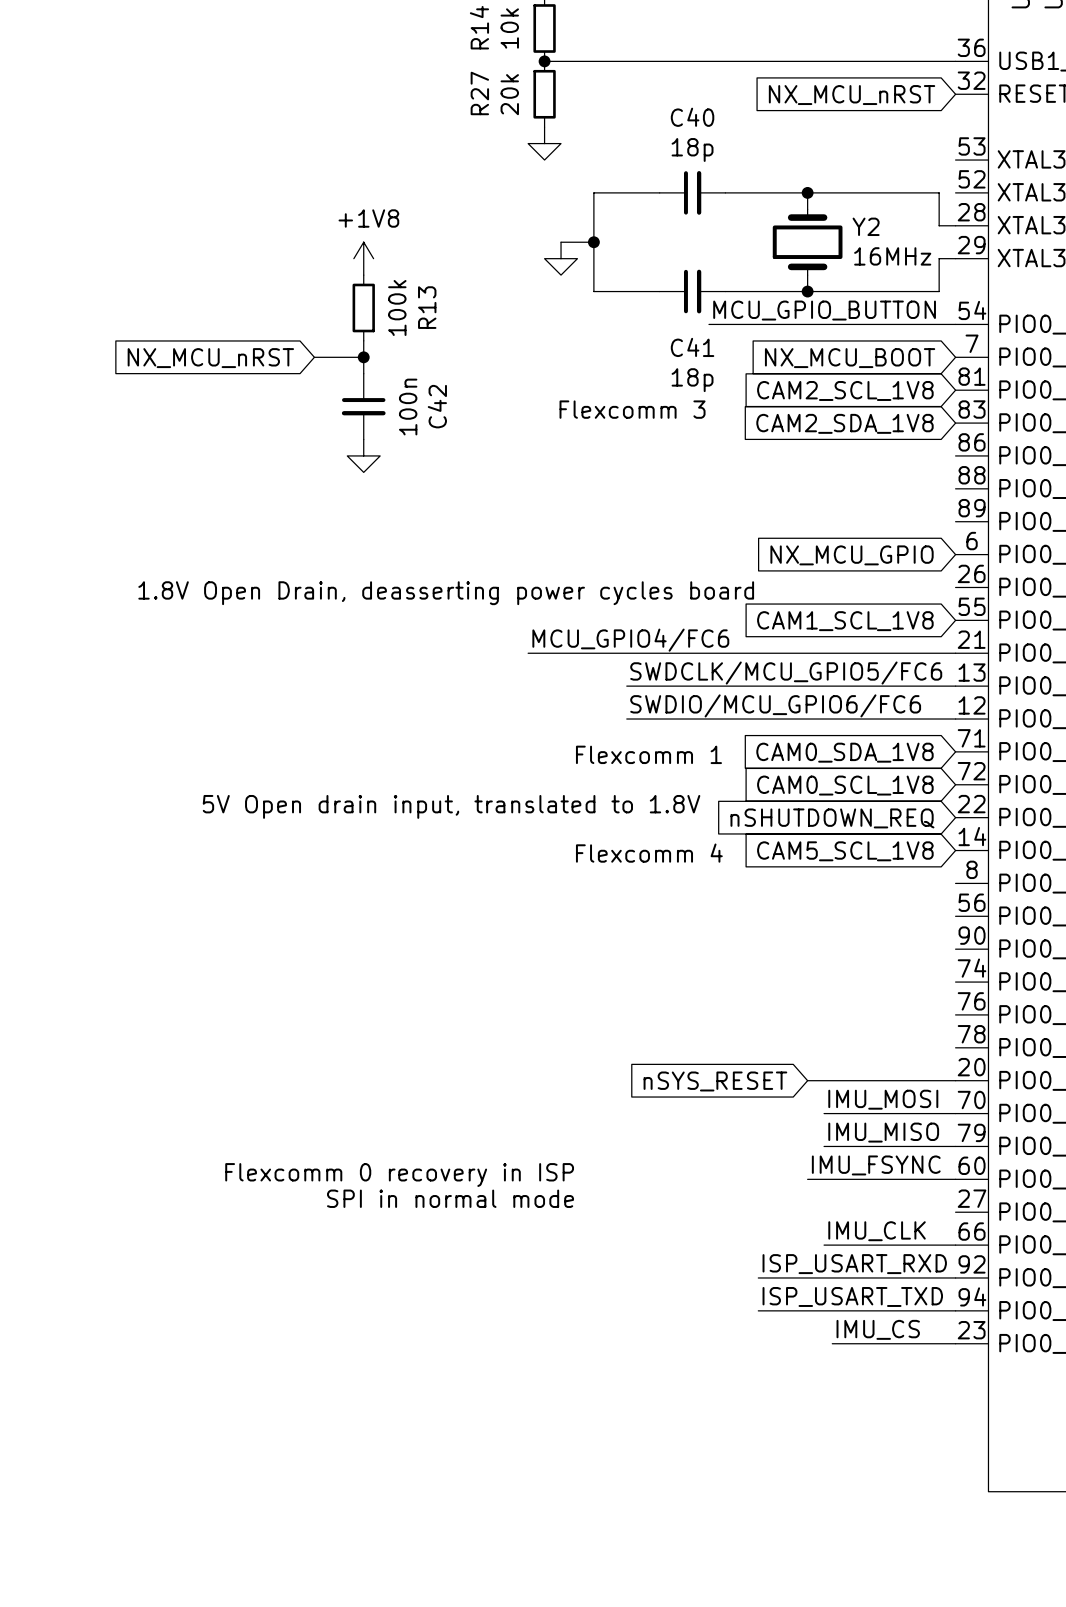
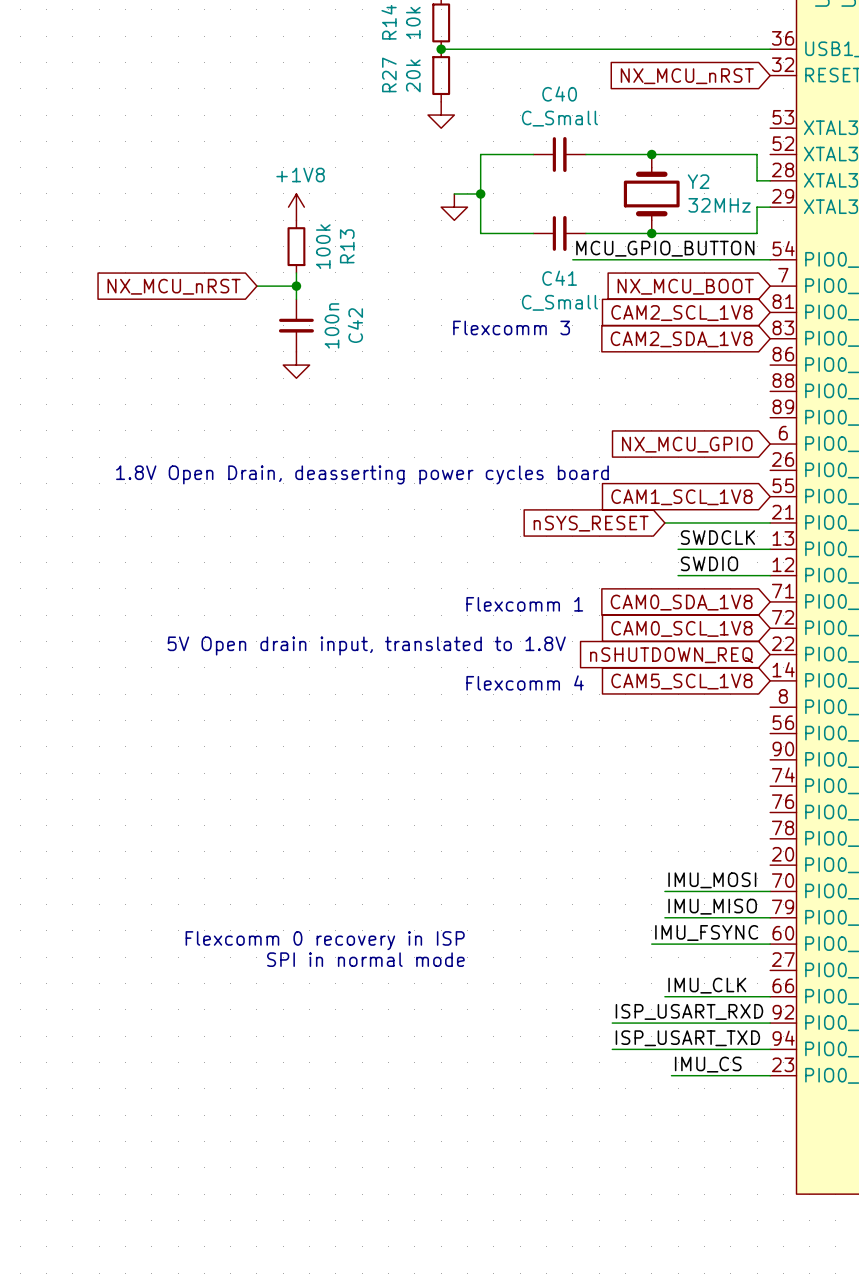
C40 value: 18p (692, 149) -> C_Small (559, 118)
Y2 value: 16MHz (892, 256) -> 32MHz (719, 205)
C41 value: 18p (692, 380) -> C_Small (559, 302)
label: MCU_GPIO4/FC6 (630, 640) -> none
wire: (528, 653) (824, 653) -> none
global label: none -> nSYS_RESET (591, 523)
label: none -> SWDCLK (717, 537)
label: SWDCLK/MCU_GPIO5/FC6 (786, 673) -> none
wire: (626, 686) (840, 686) -> none
label: none -> SWDIO (709, 563)
label: SWDIO/MCU_GPIO6/FC6 (775, 705) -> none
wire: (626, 719) (840, 719) -> none
wire: (807, 1080) (955, 1080) -> none
global label: nSYS_RESET (715, 1081) -> none

